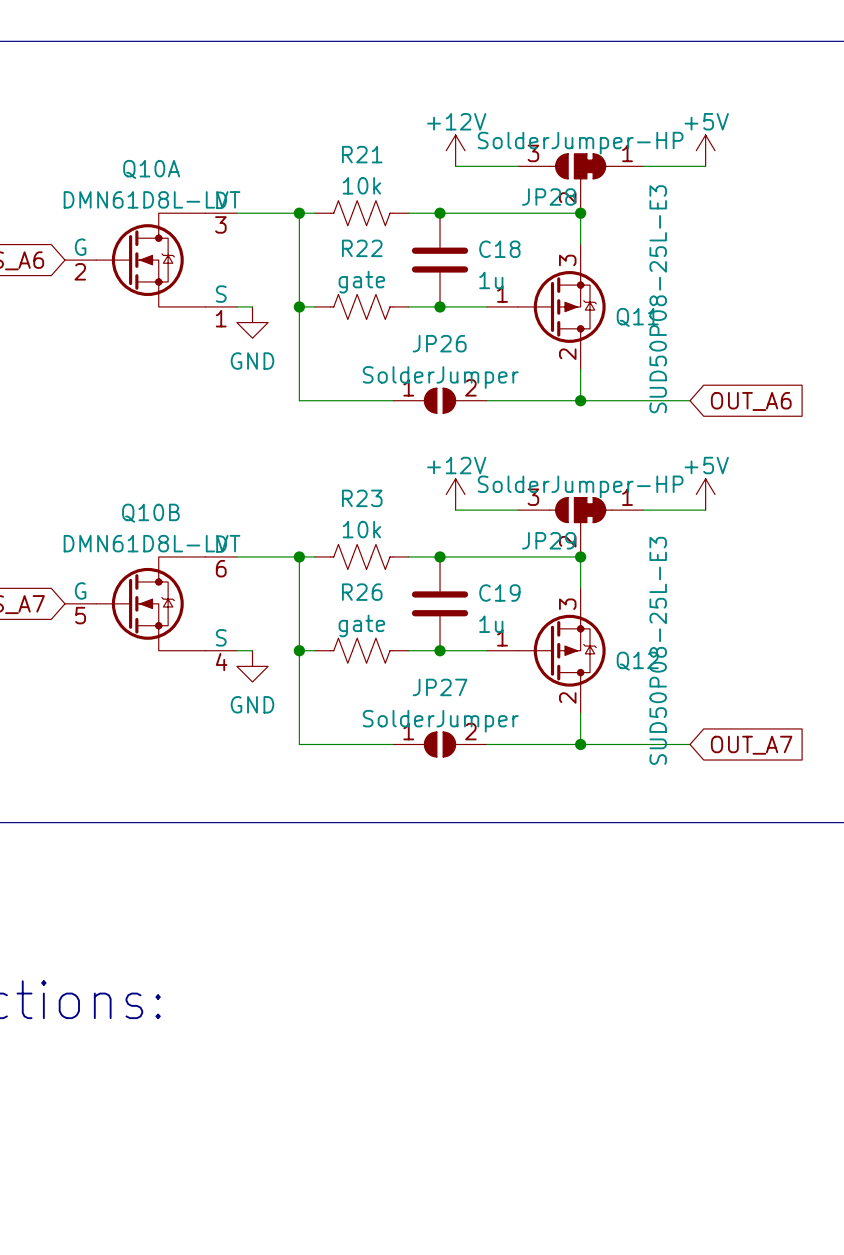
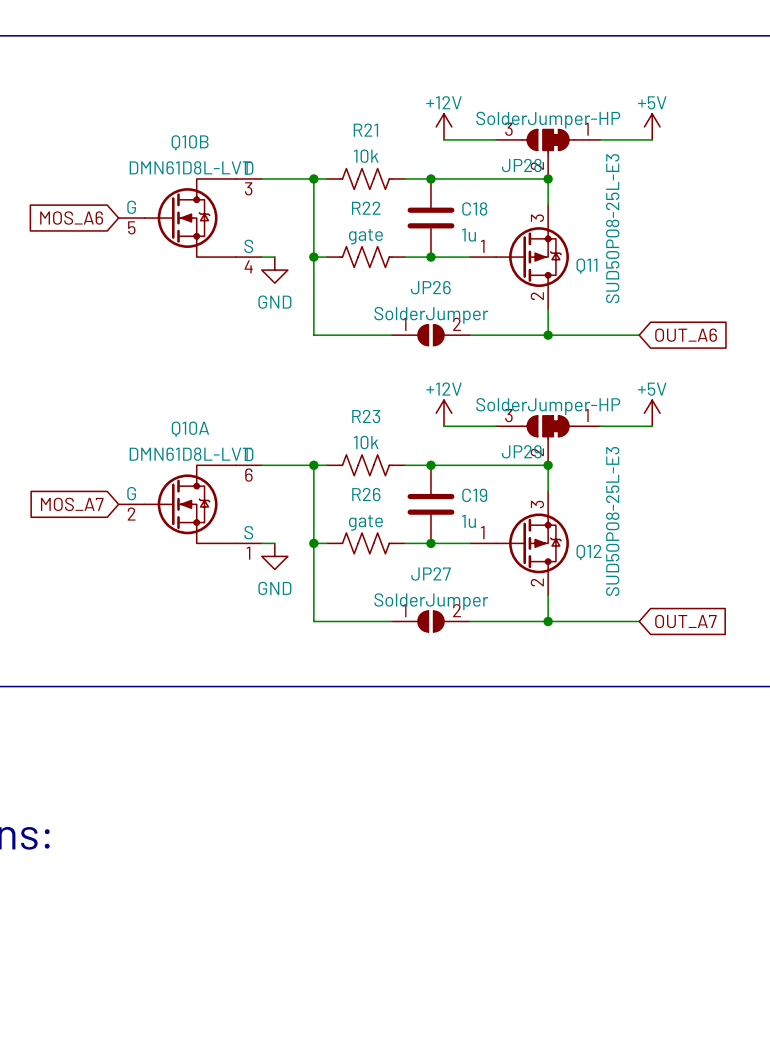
Q10A position: (150, 260) -> (190, 504)
Q10B position: (150, 603) -> (190, 218)

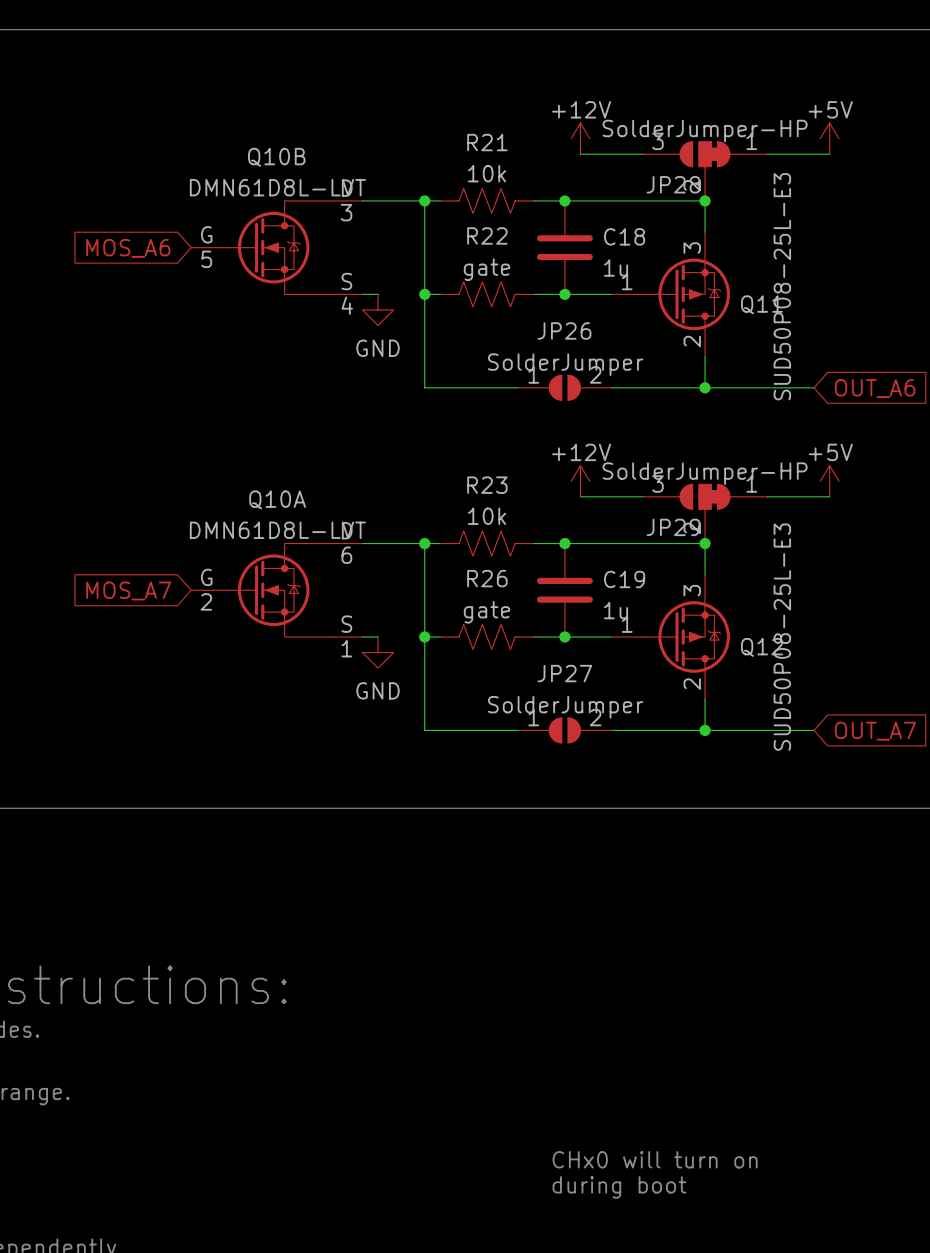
text: none -> CHx0 will turn on (655, 1159)
text: none -> during boot (619, 1187)

